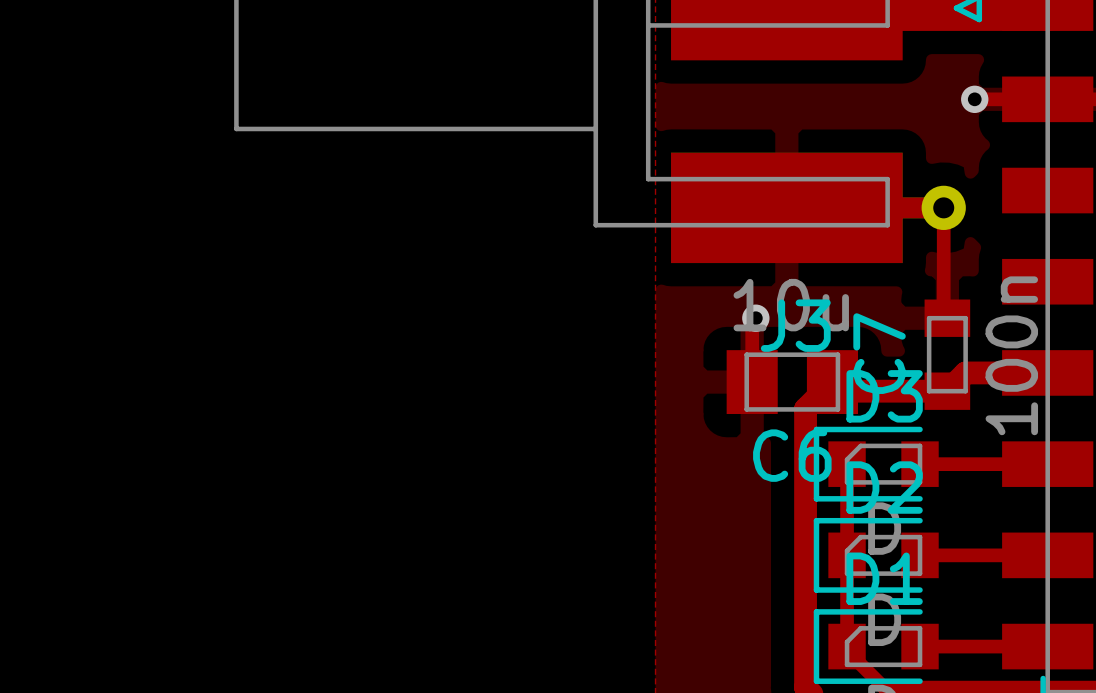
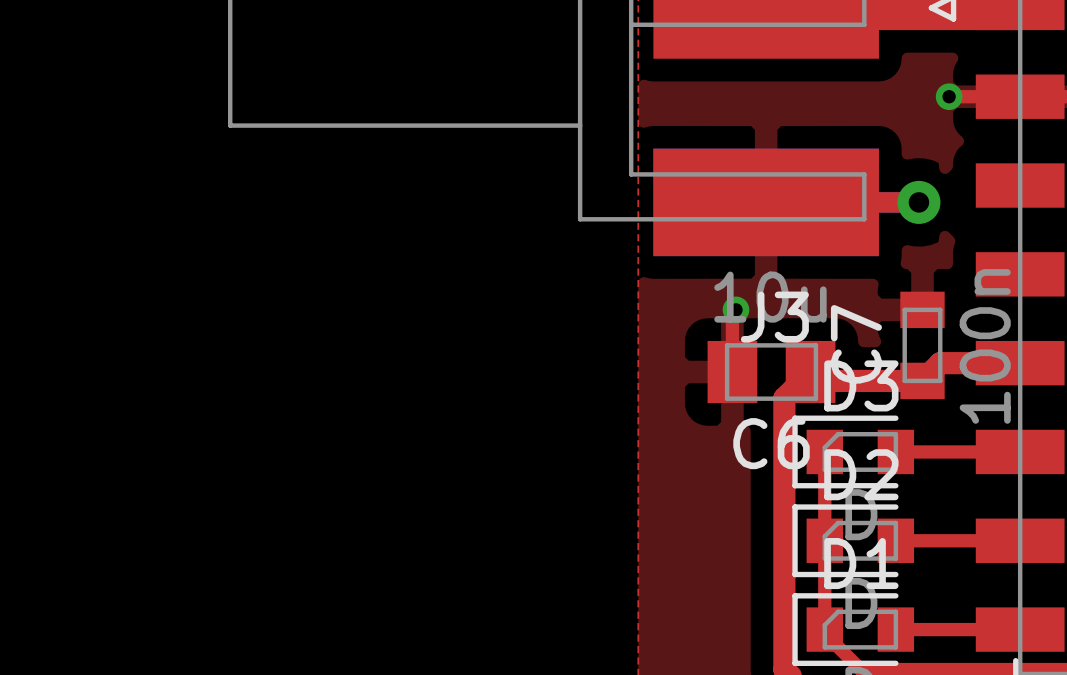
top track: (943, 207) (943, 314) (947, 318) -> none

